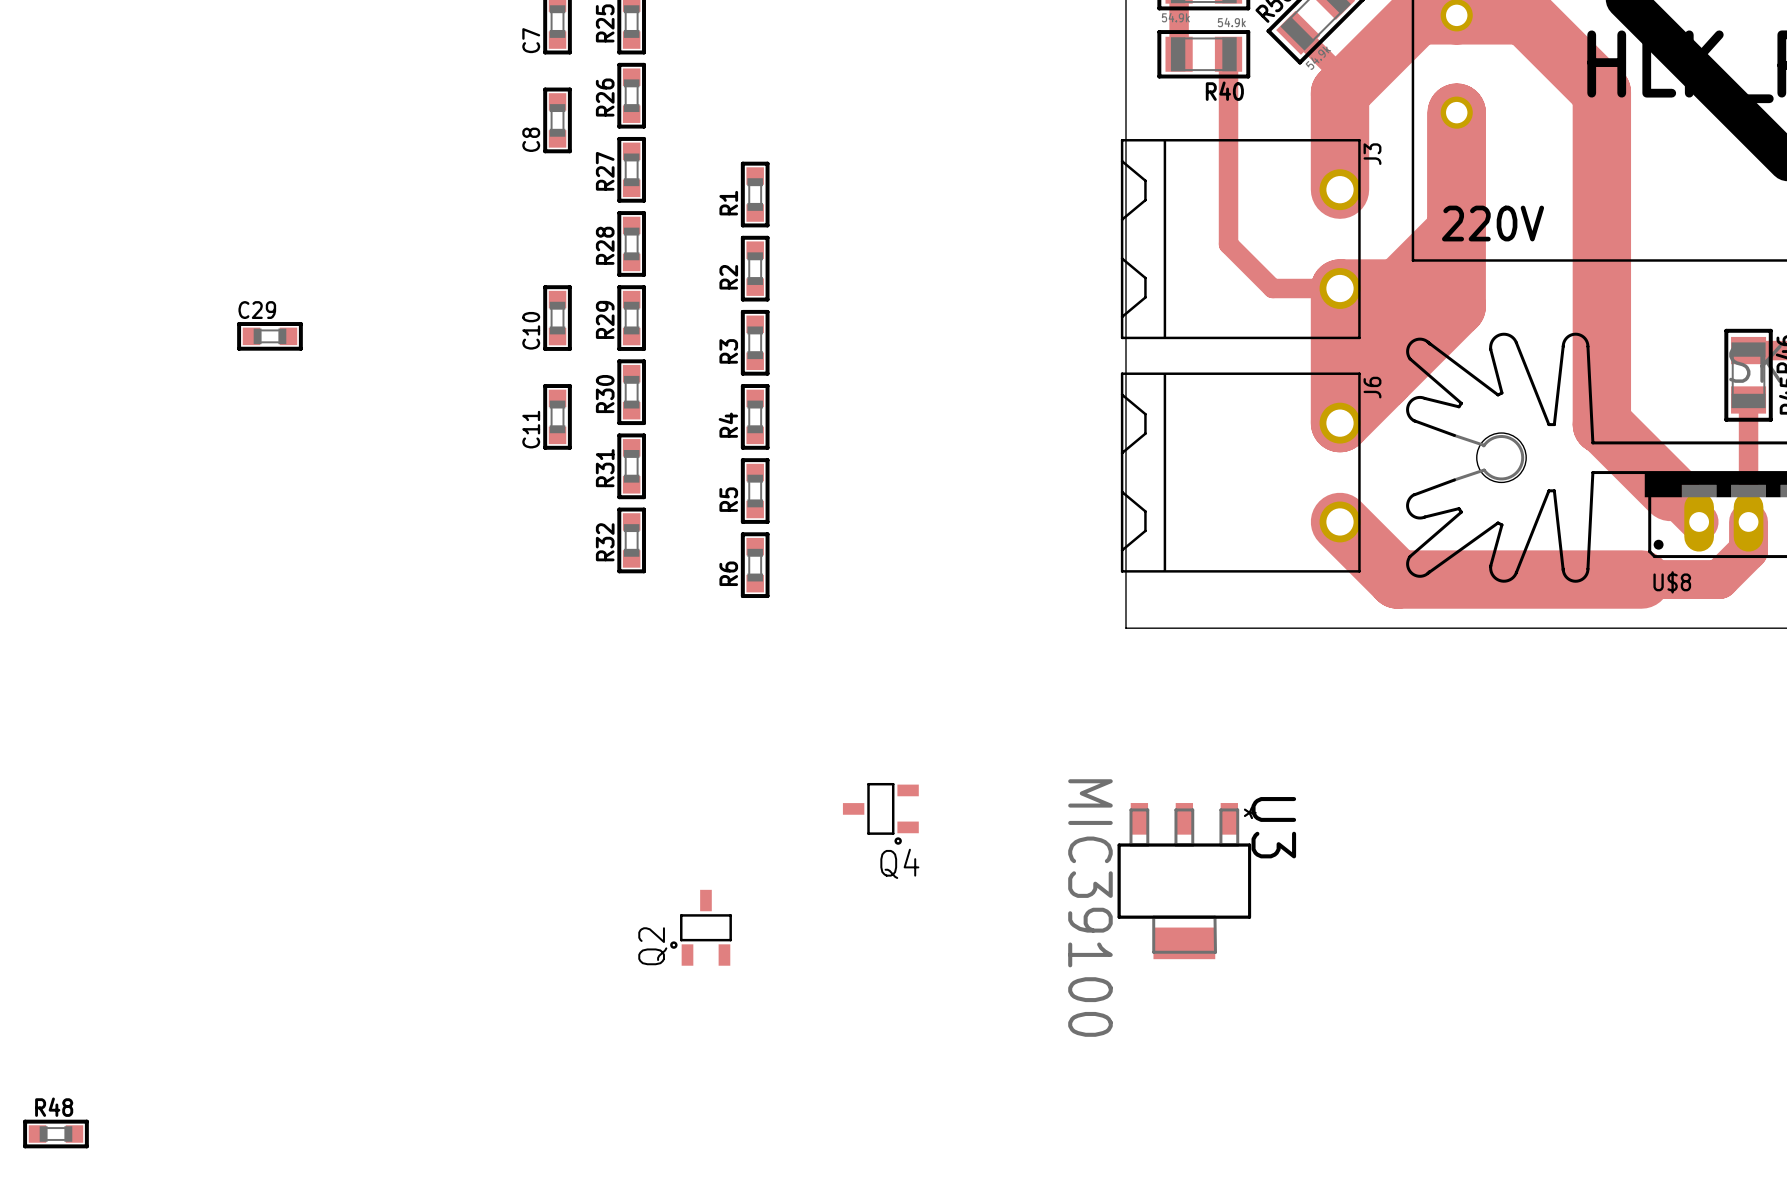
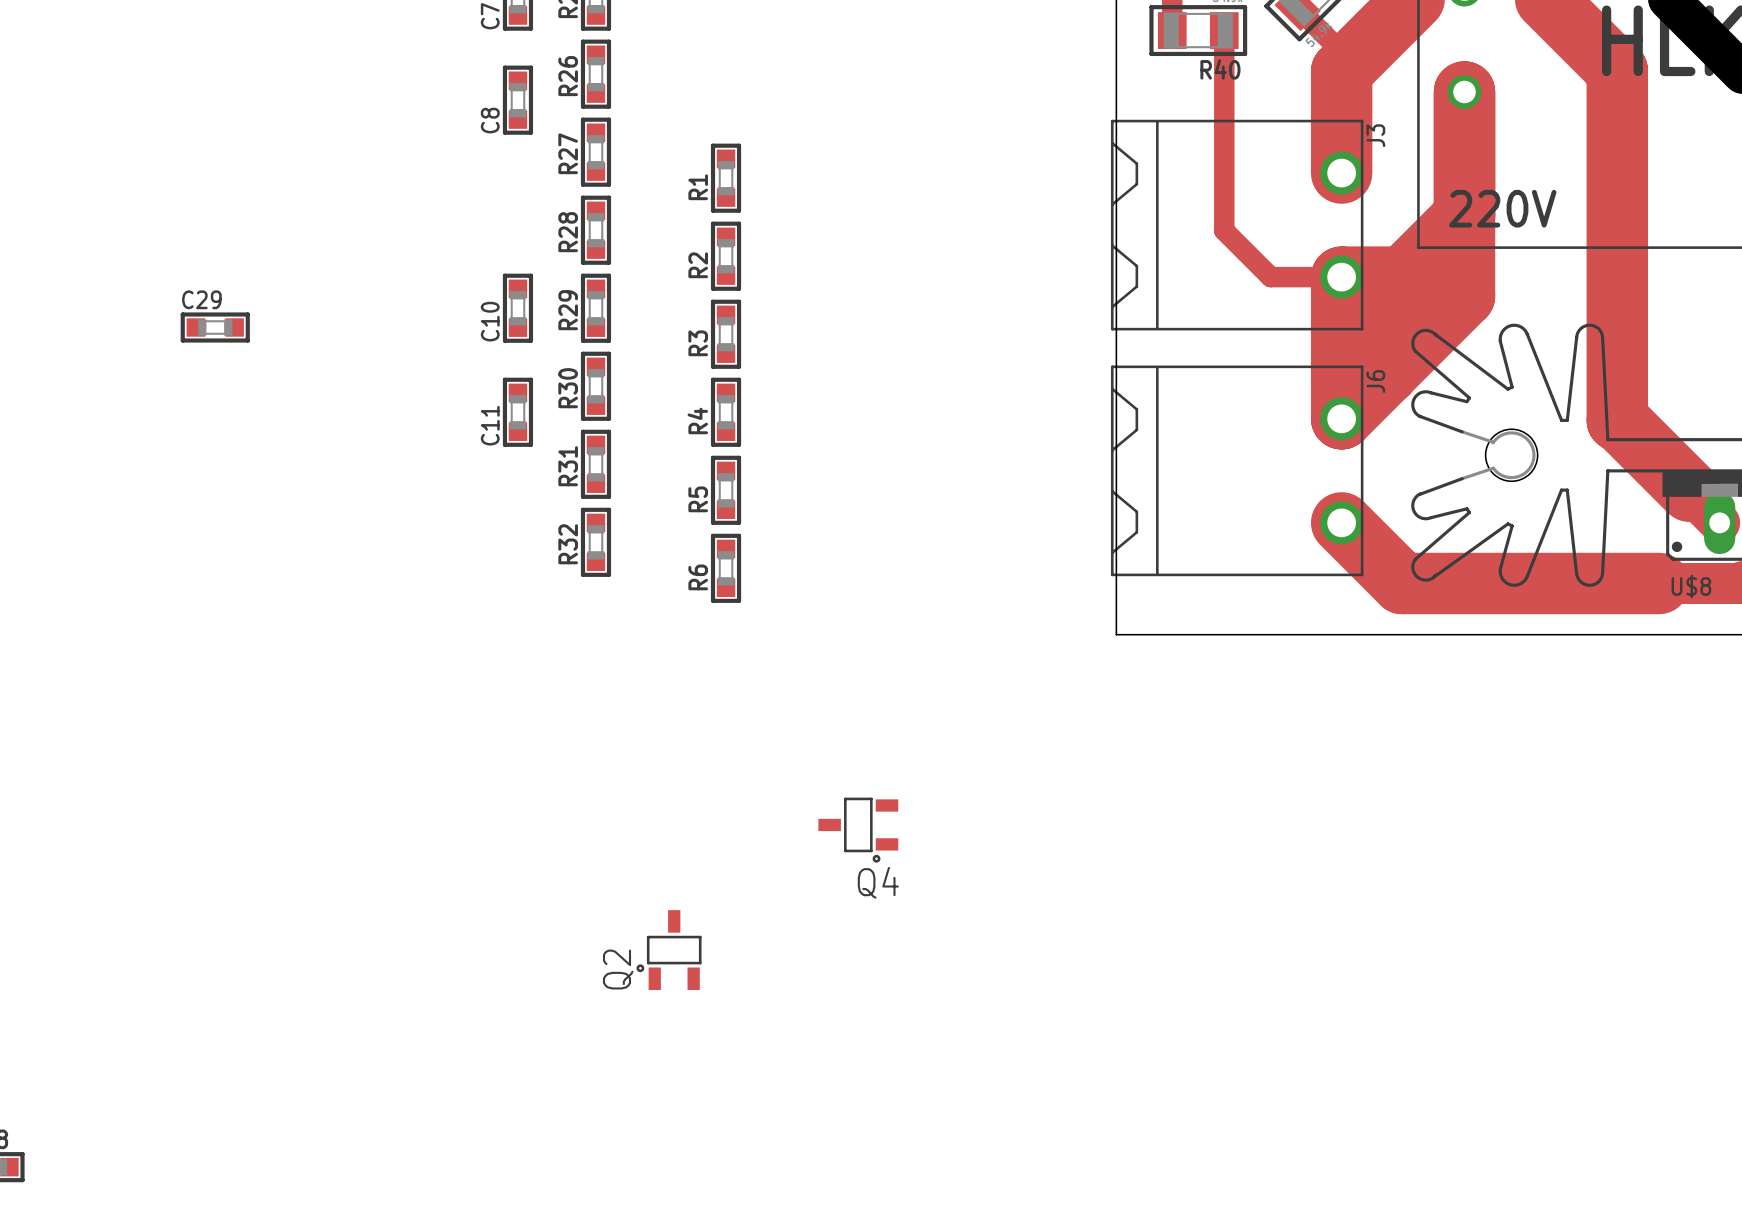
U3: MIC39100 (1184, 881) -> none

